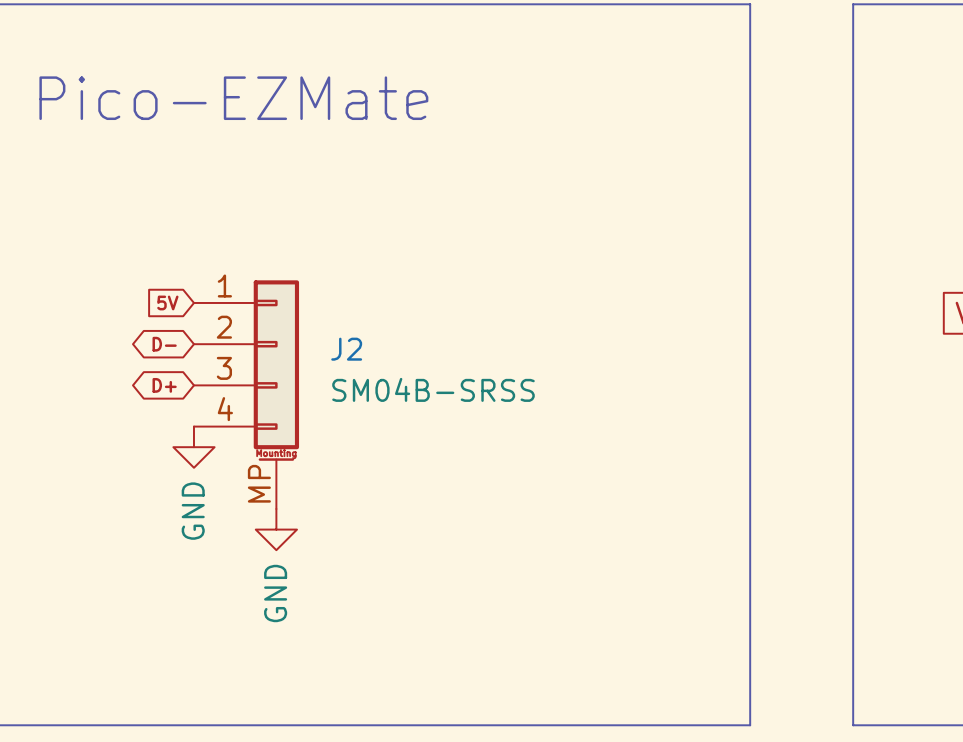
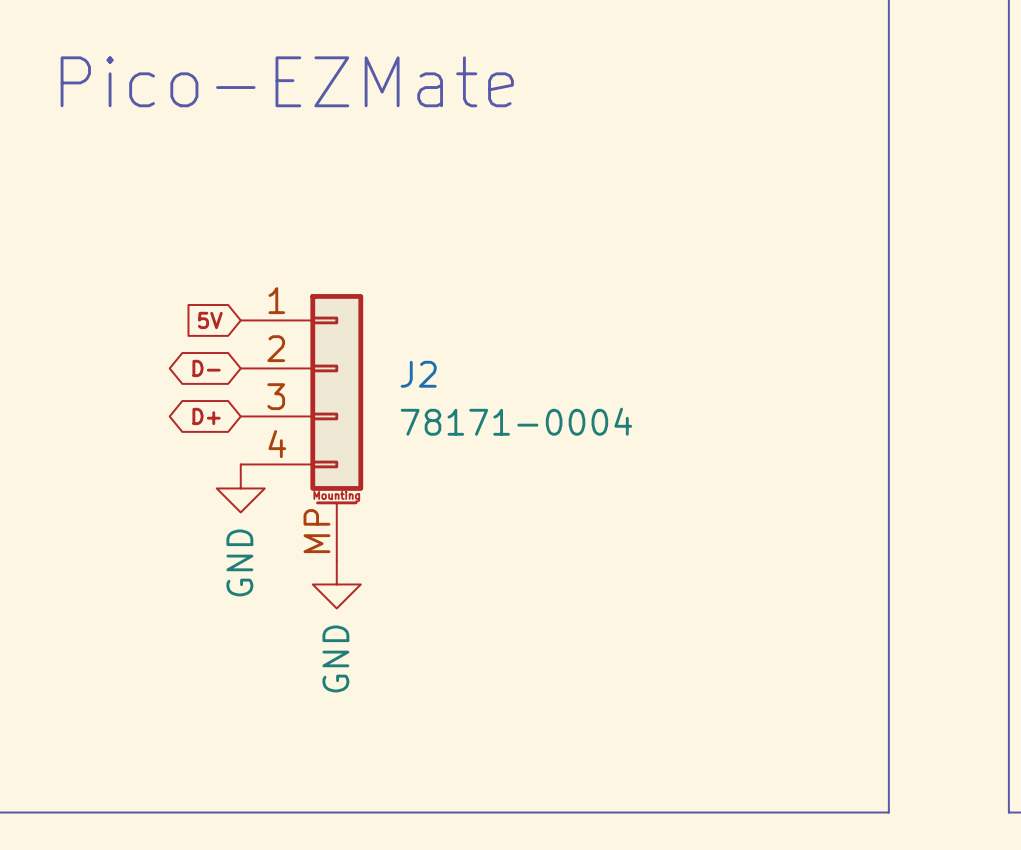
J2 value: SM04B-SRSS (433, 389) -> 78171-0004 (516, 421)

